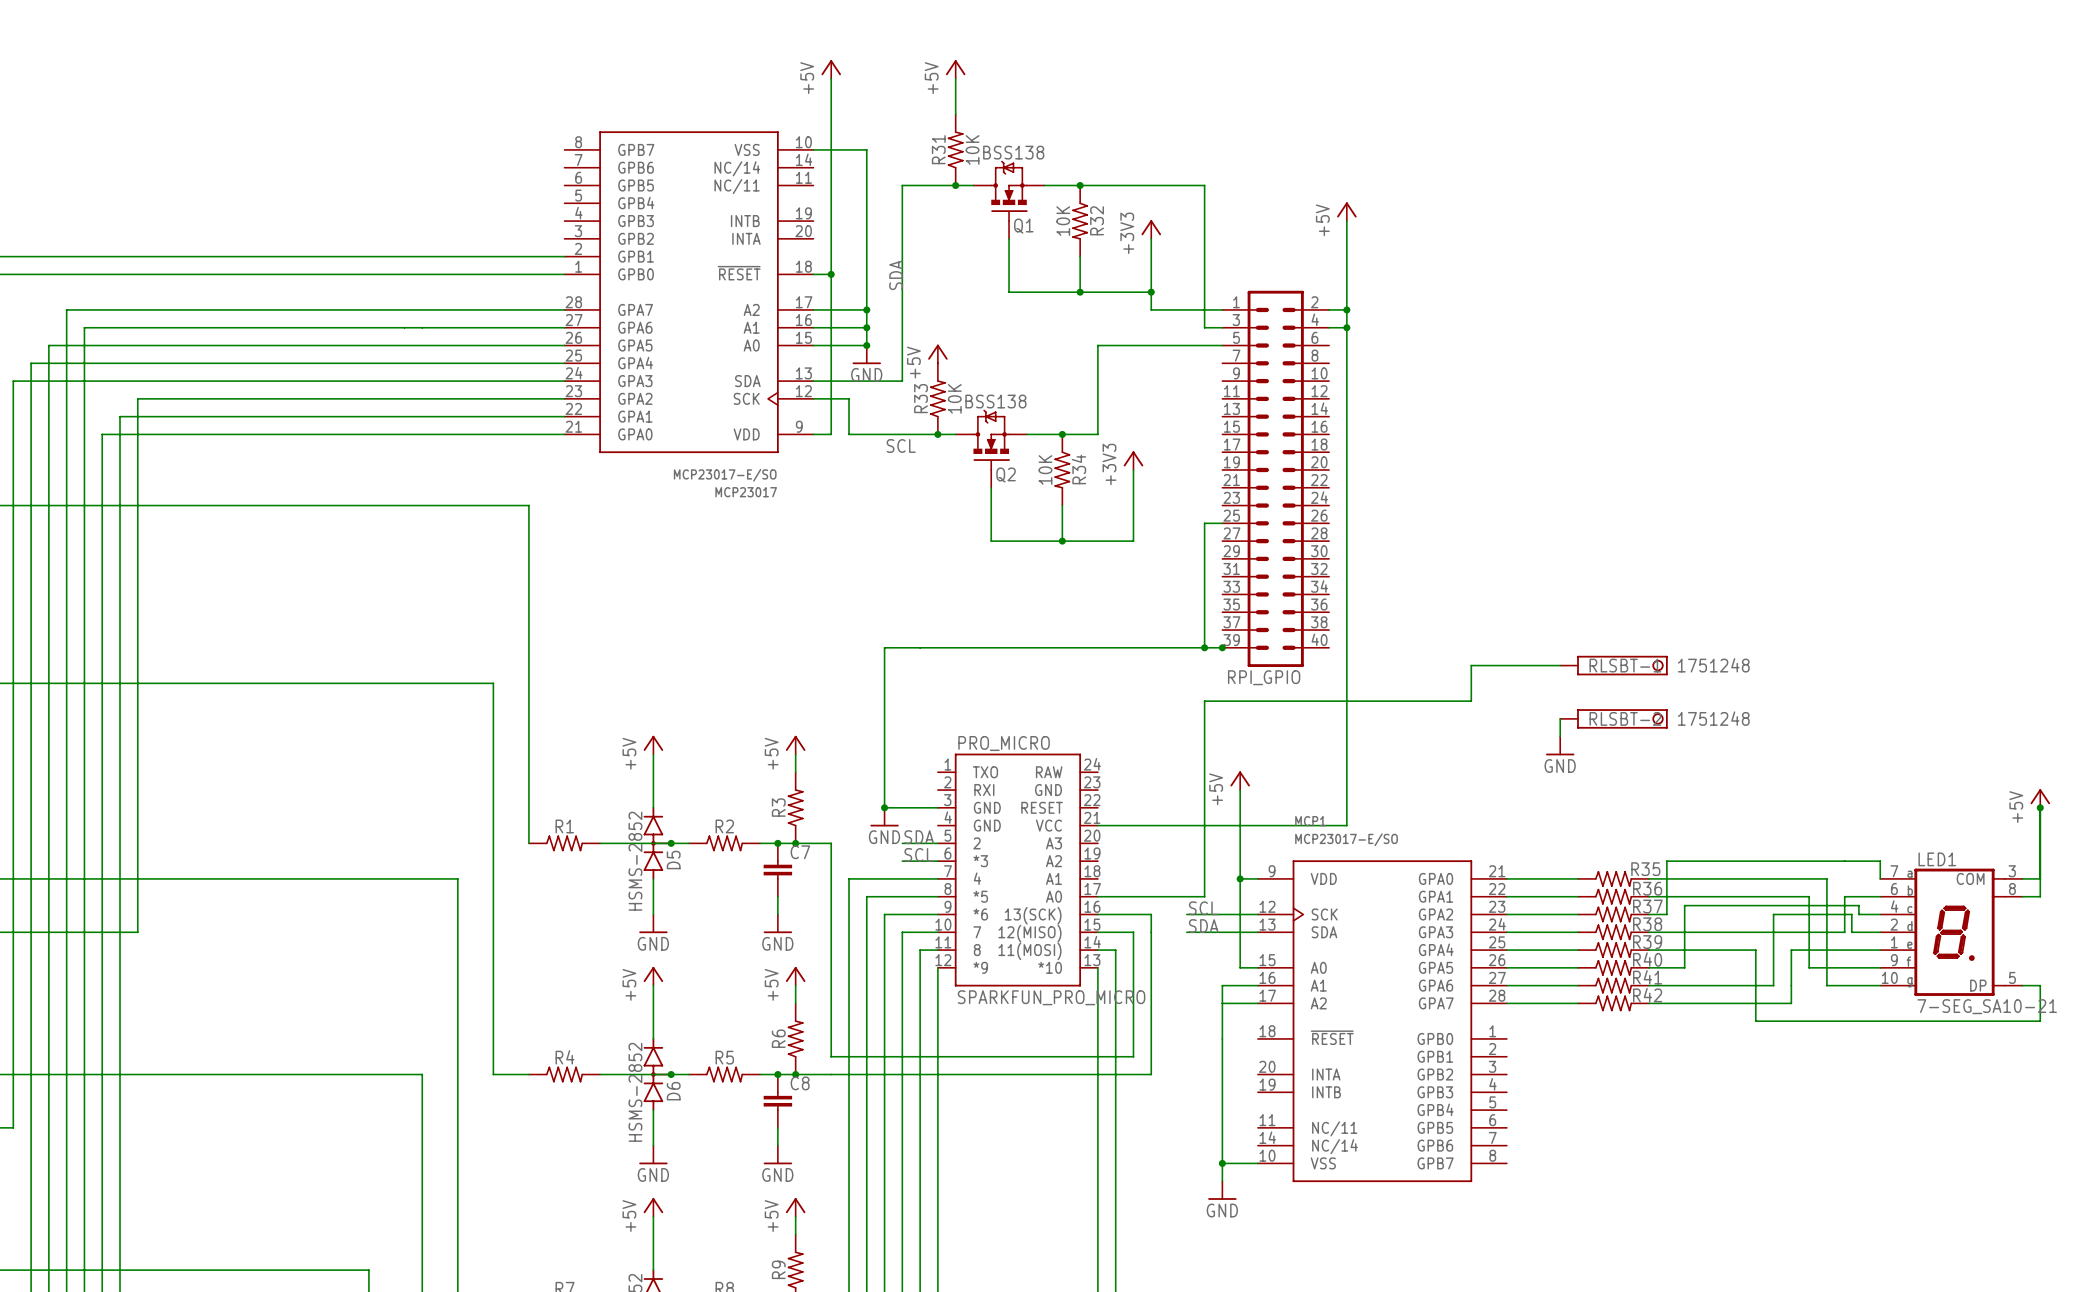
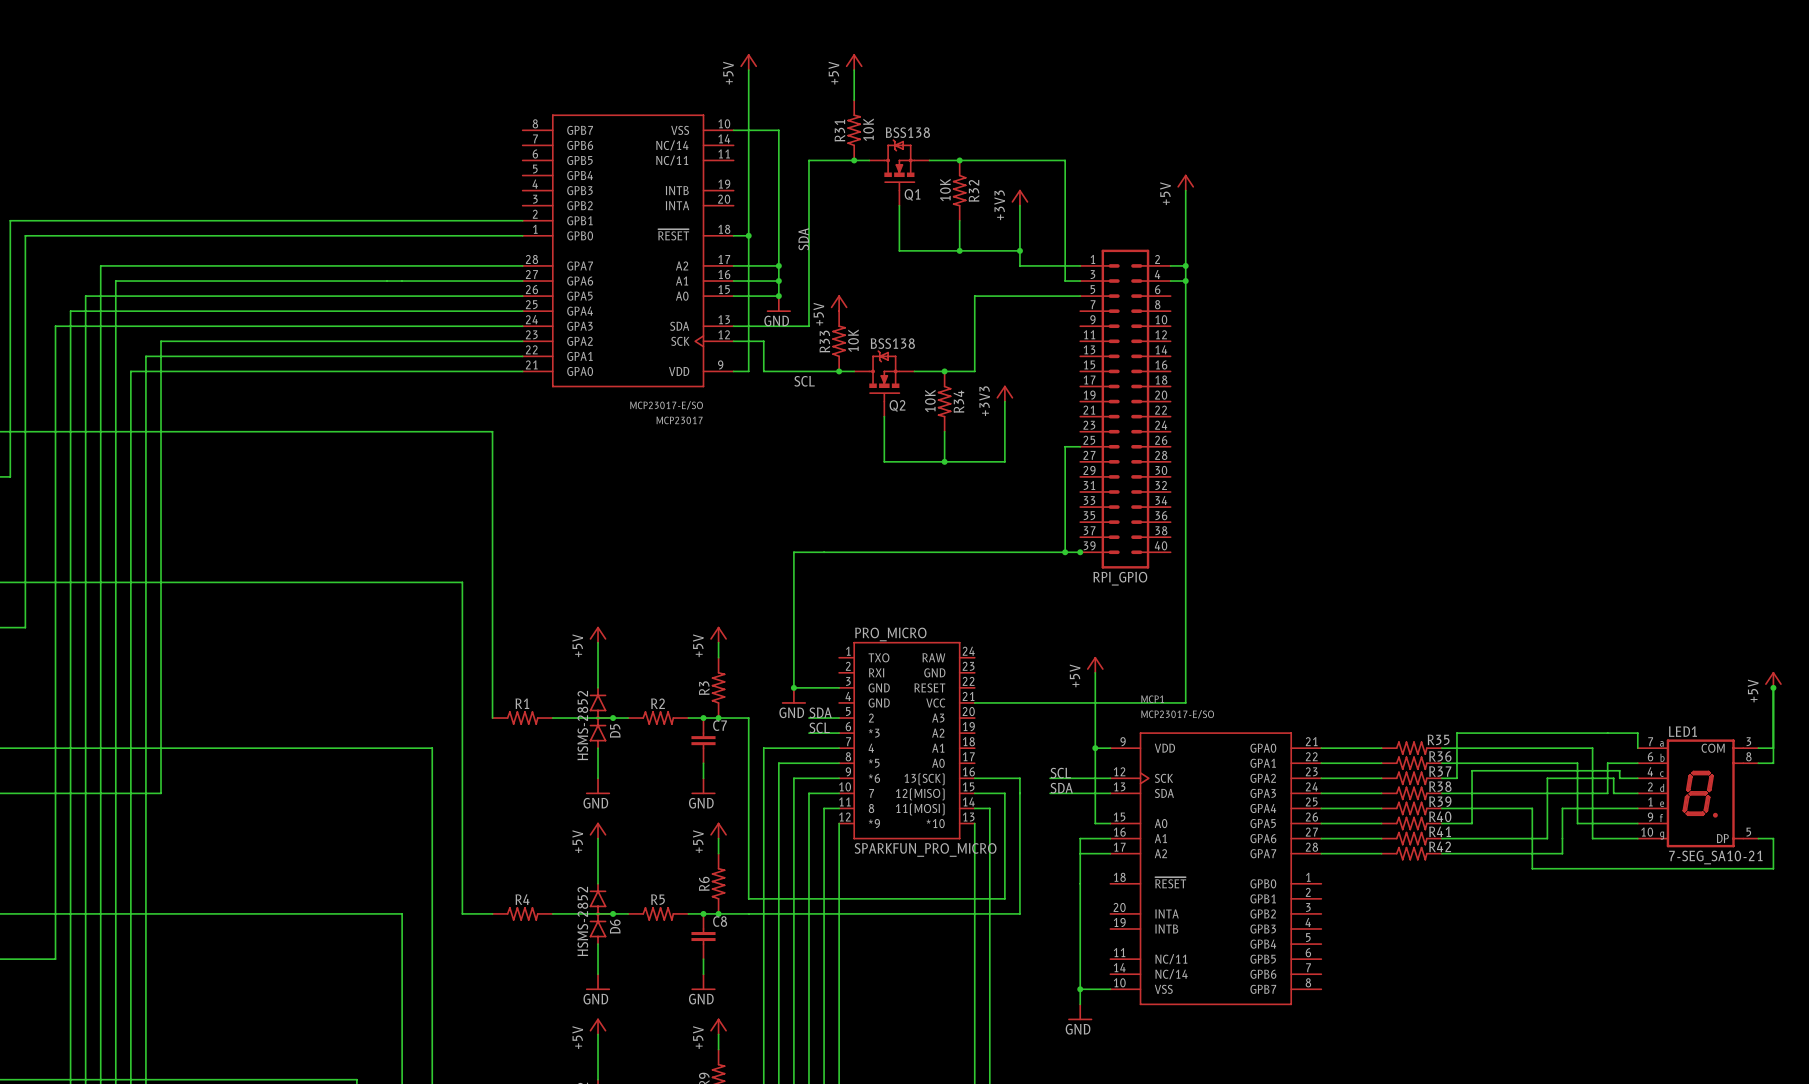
wire: (1560, 665) (1471, 665) (1471, 701) (1204, 701) (1204, 896) (1097, 896) -> none
RLSBT-1: 1751248 (1614, 665) -> none
wire: (1560, 718) (1560, 736) -> none
RLSBT-2: 1751248 (1614, 718) -> none
power symbol: GND (1560, 746) -> none

